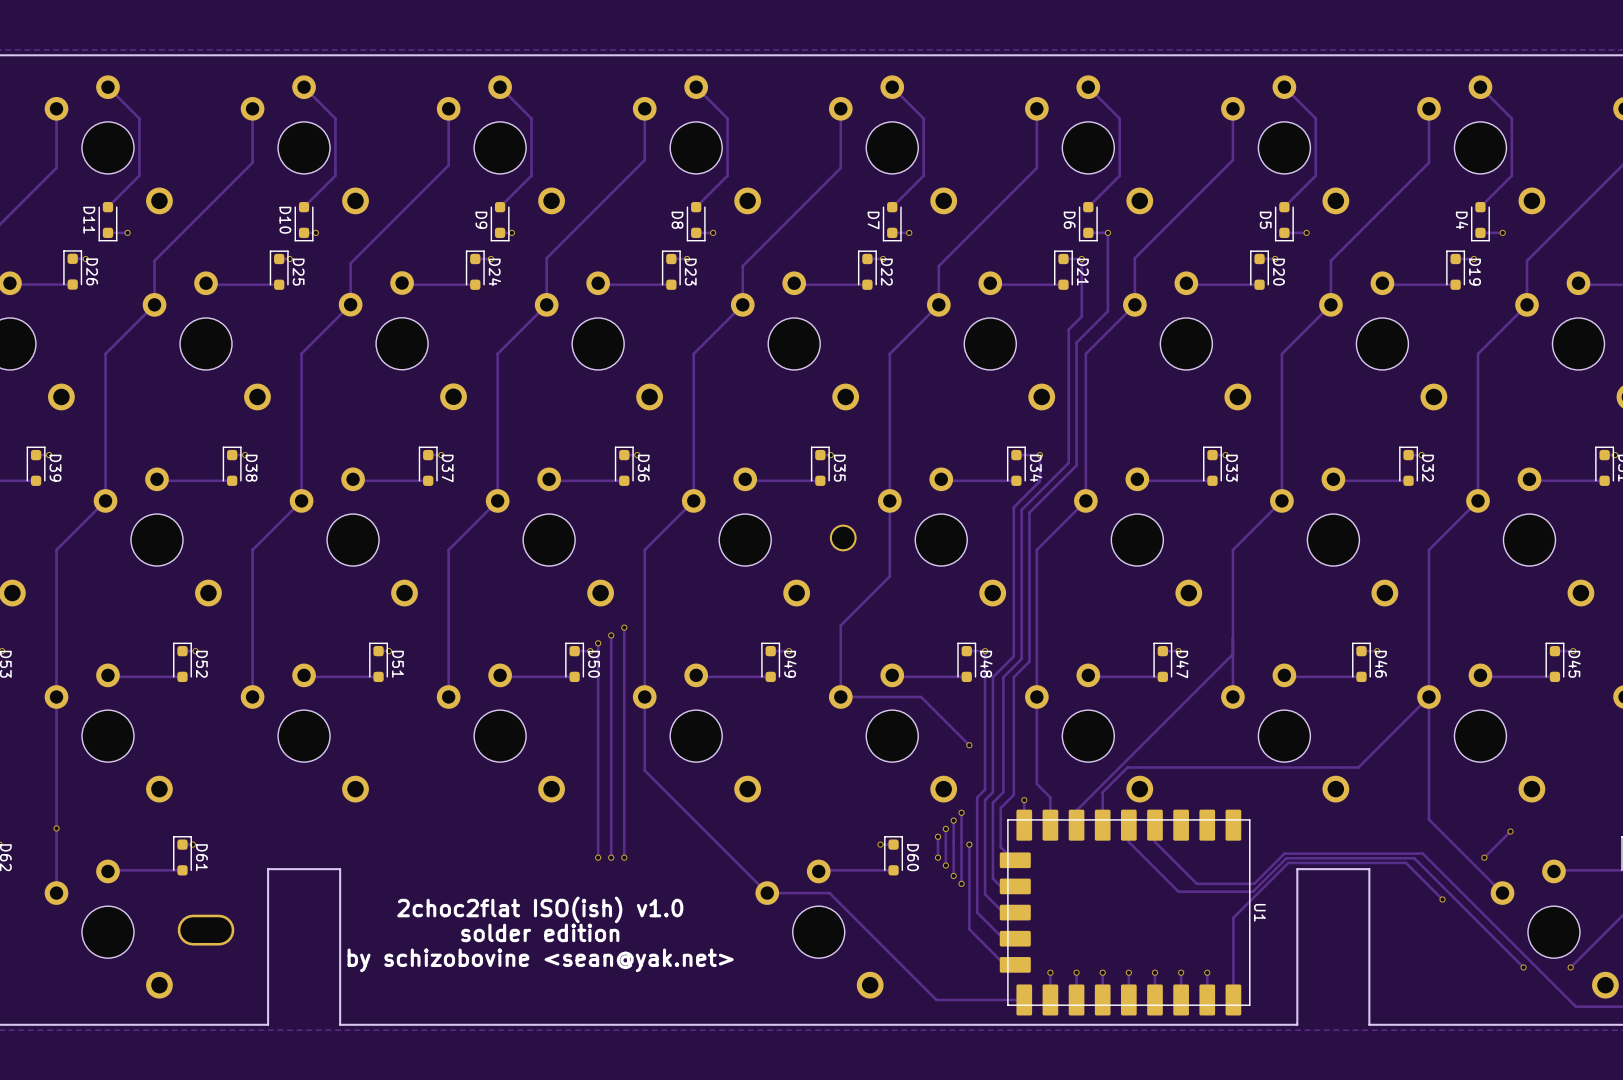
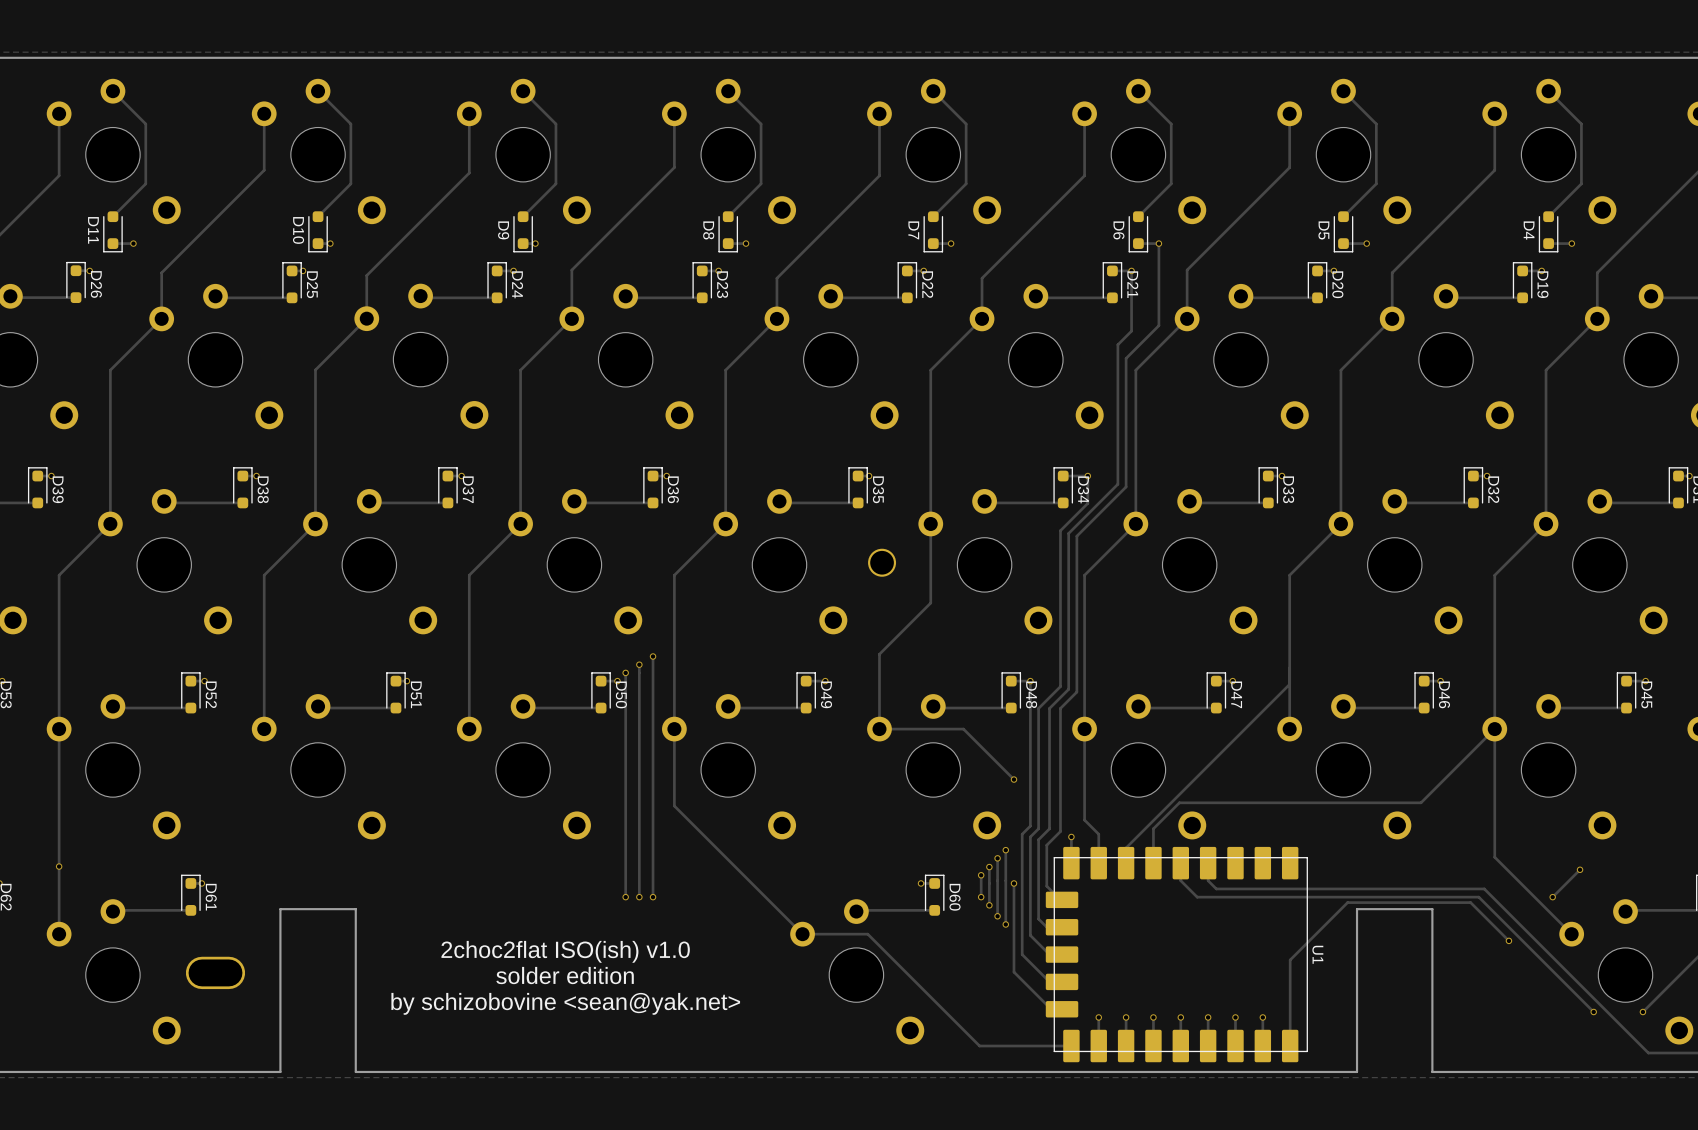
track: (1162, 849) (1196, 883) (1254, 883) (1284, 853) (1422, 853) -> (1216, 888) (1484, 888) (1488, 892)
track: (1144, 857) (1178, 891) (1253, 891) (1286, 858) (1414, 858) -> (1197, 897) (1479, 897)

